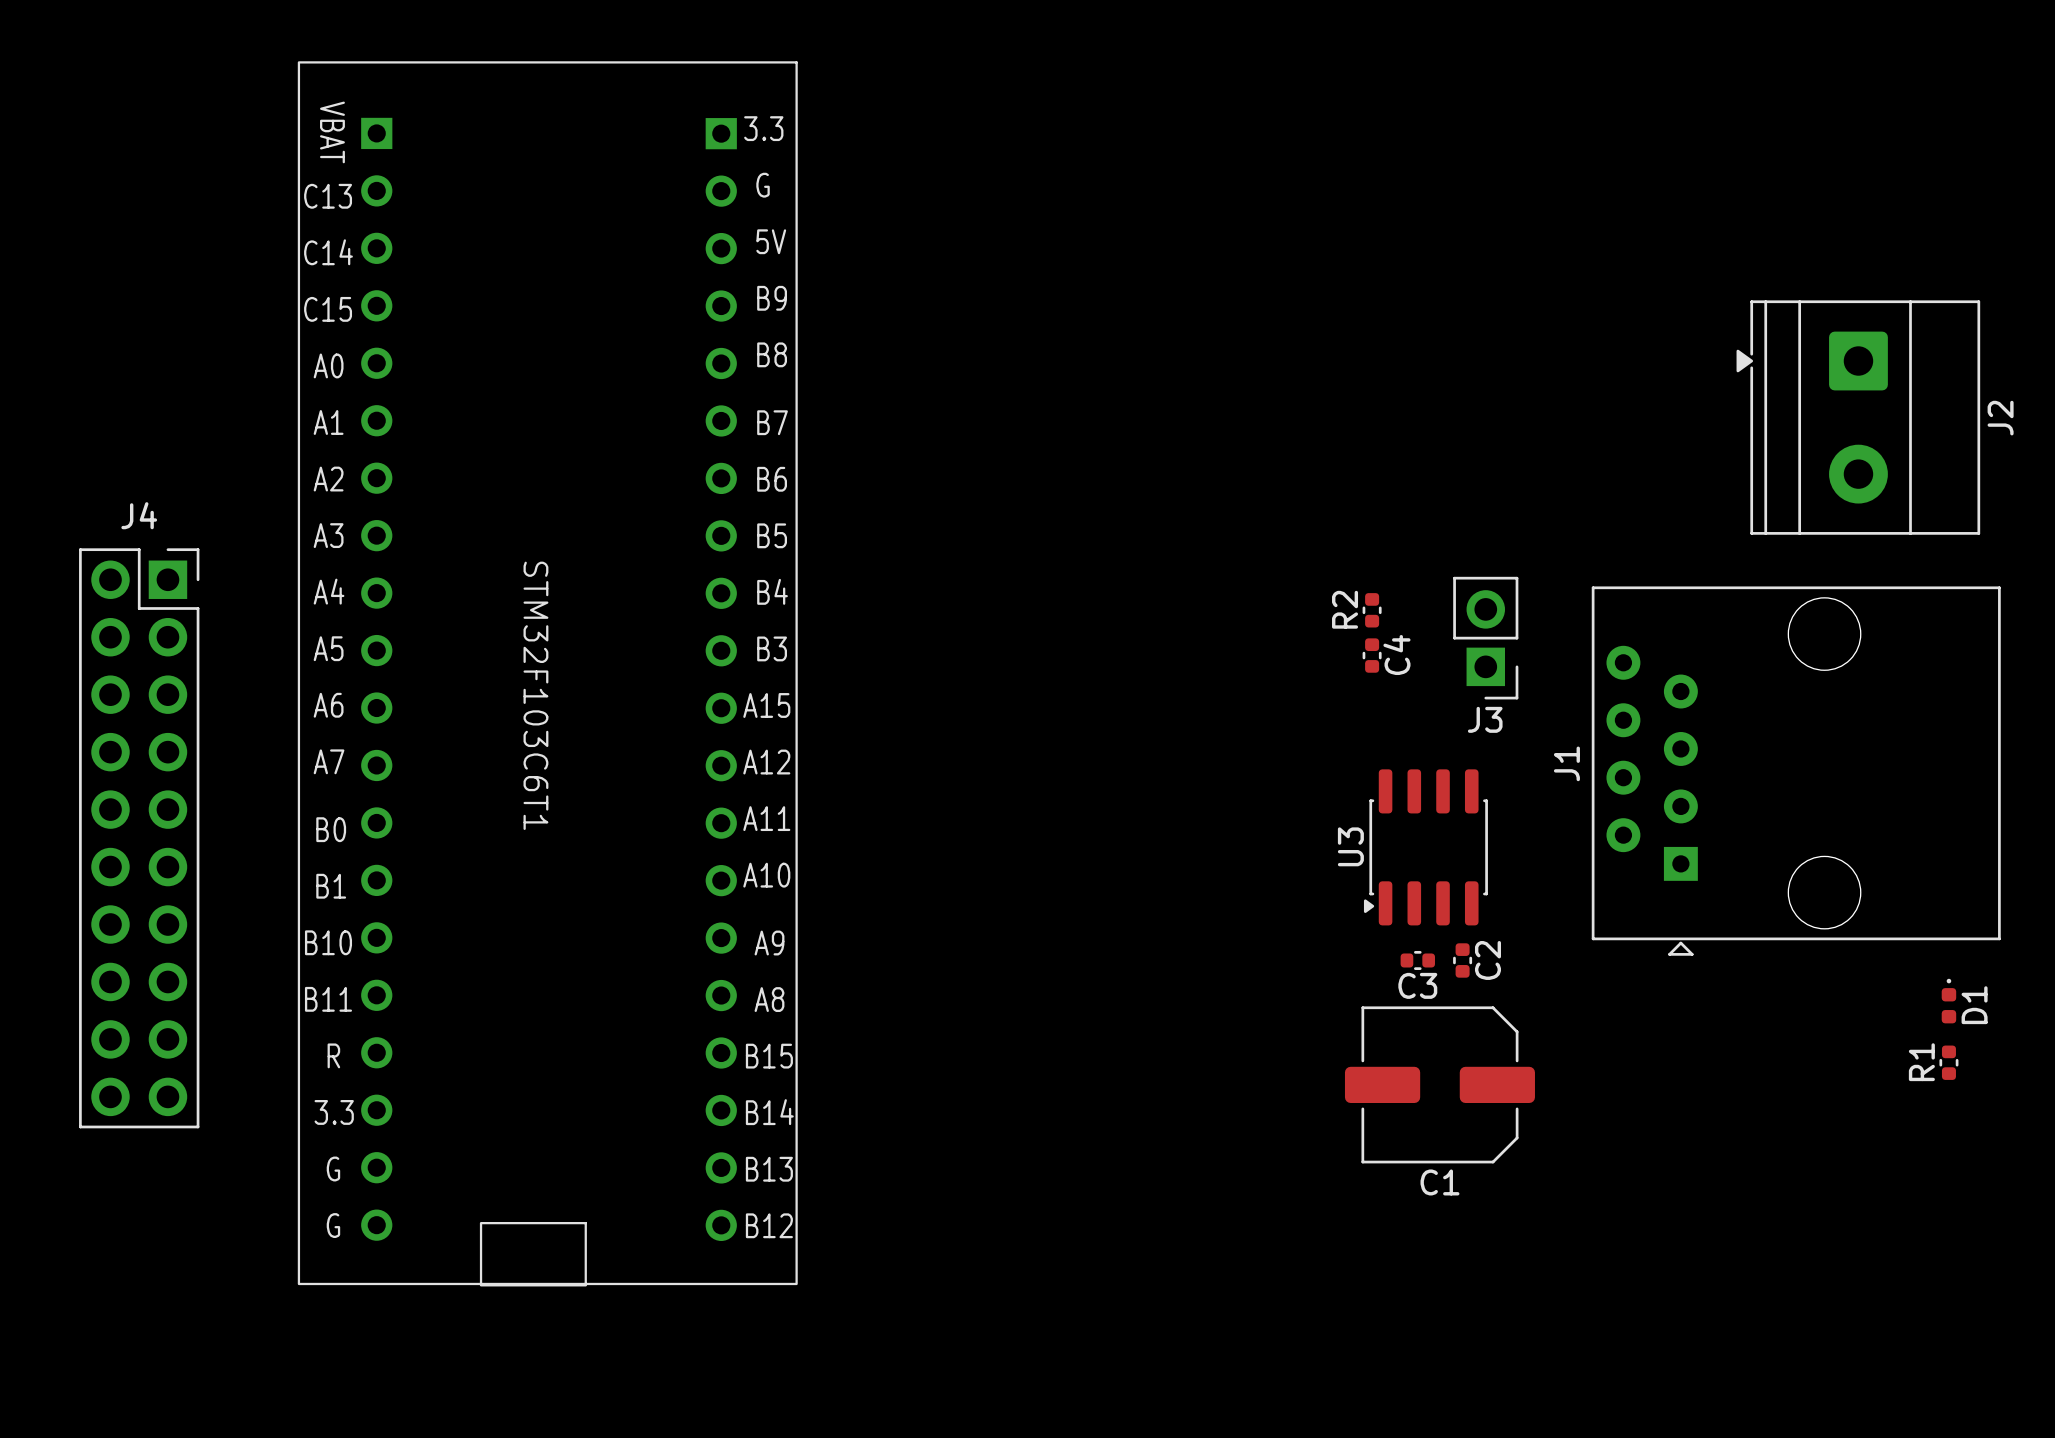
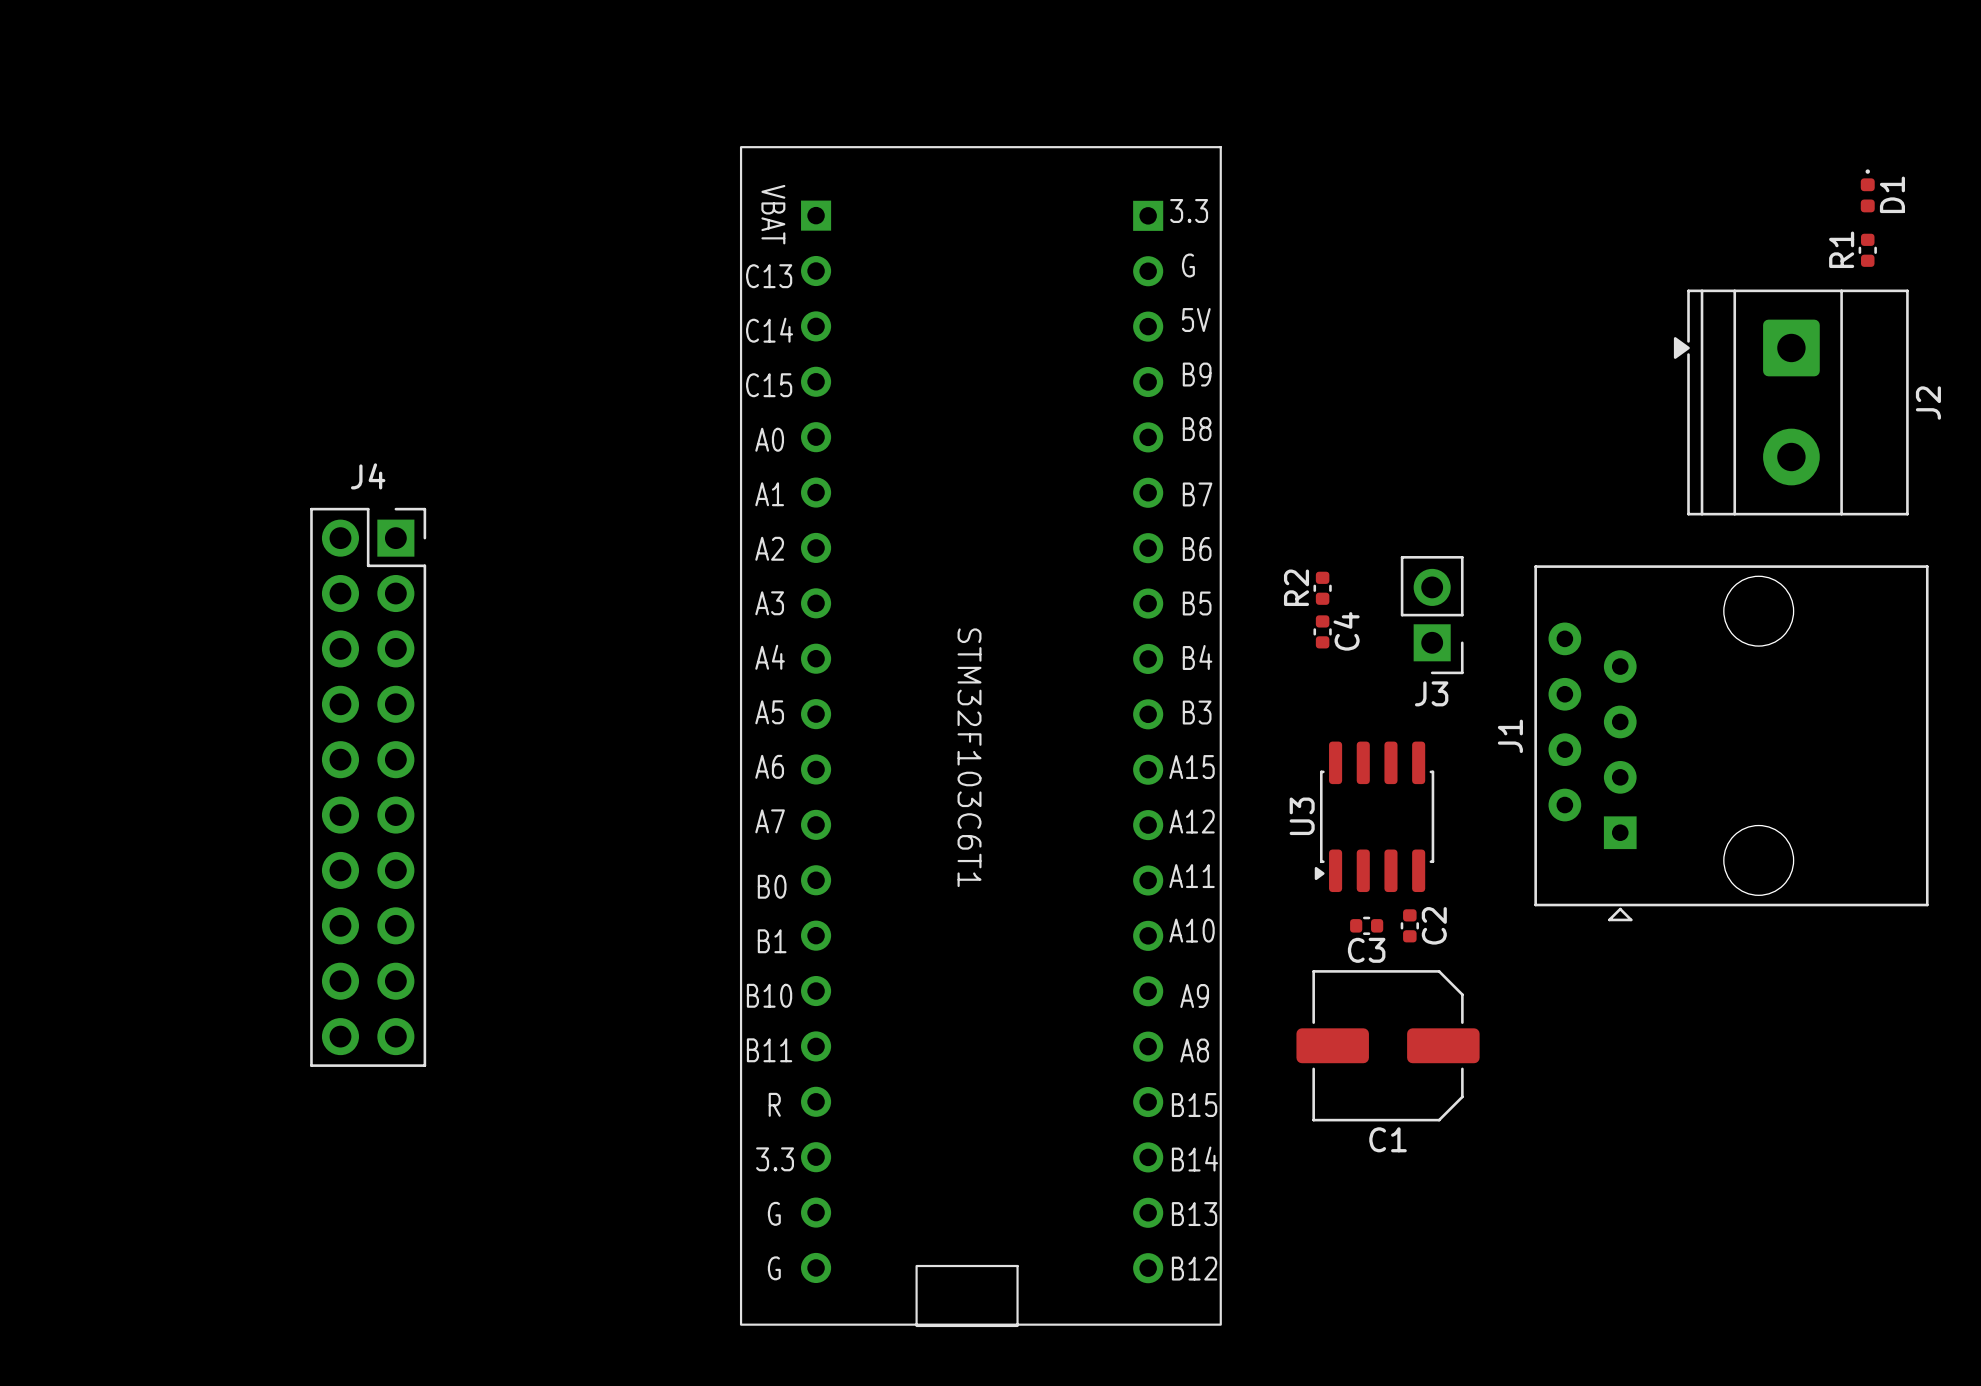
STM32F103C6T1 position: (547, 673) -> (980, 736)
J4 position: (139, 838) -> (368, 787)
D1 position: (1948, 1001) -> (1867, 190)
R1 position: (1948, 1062) -> (1867, 250)

